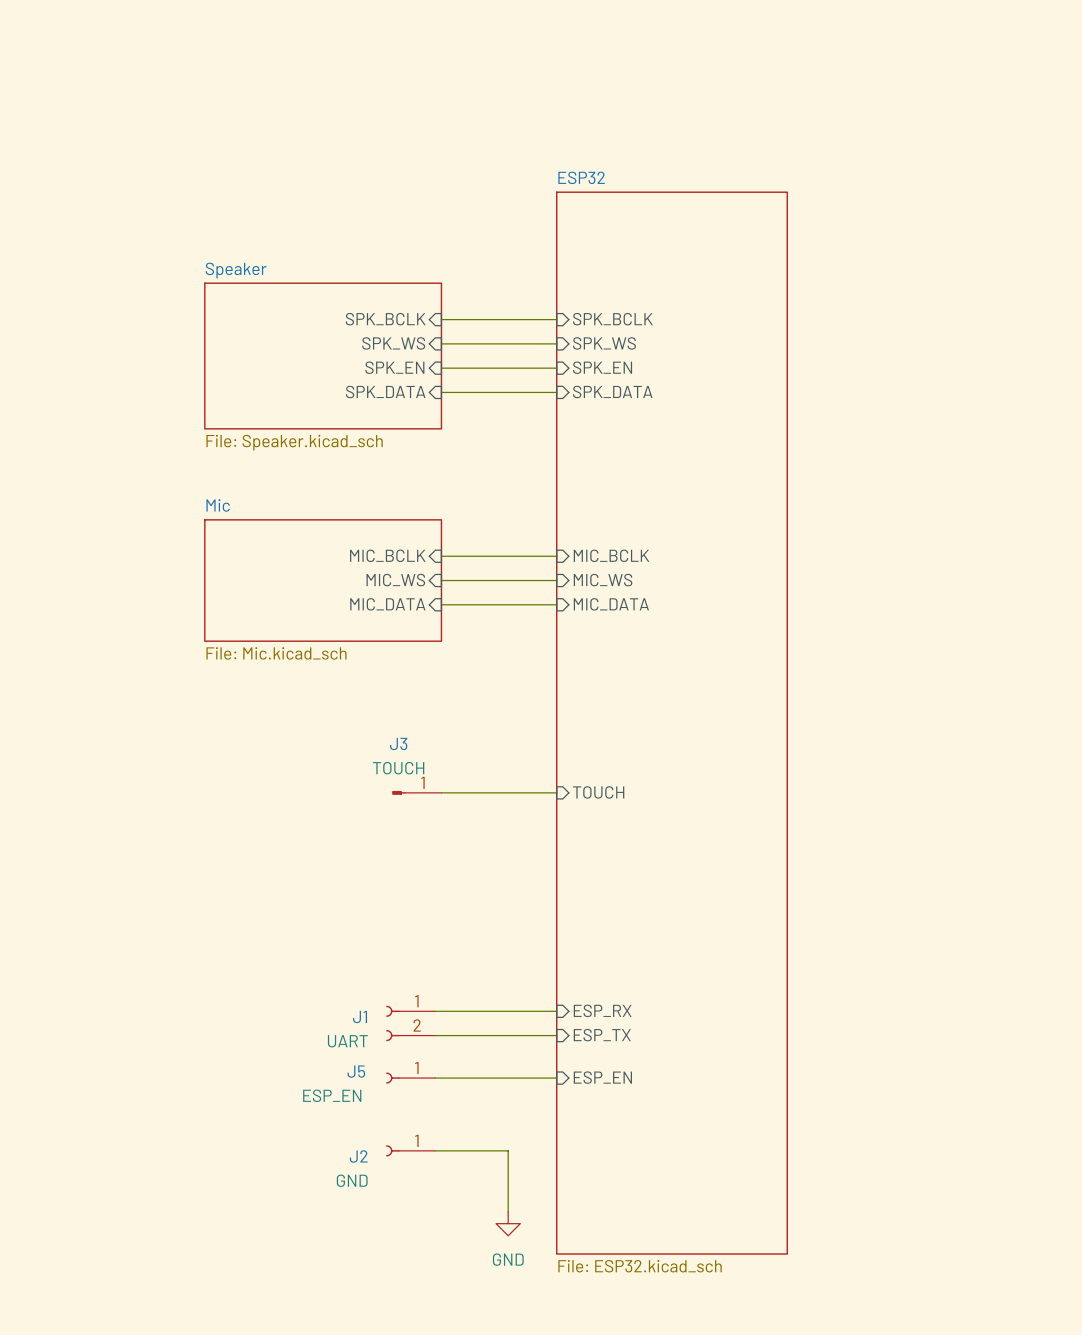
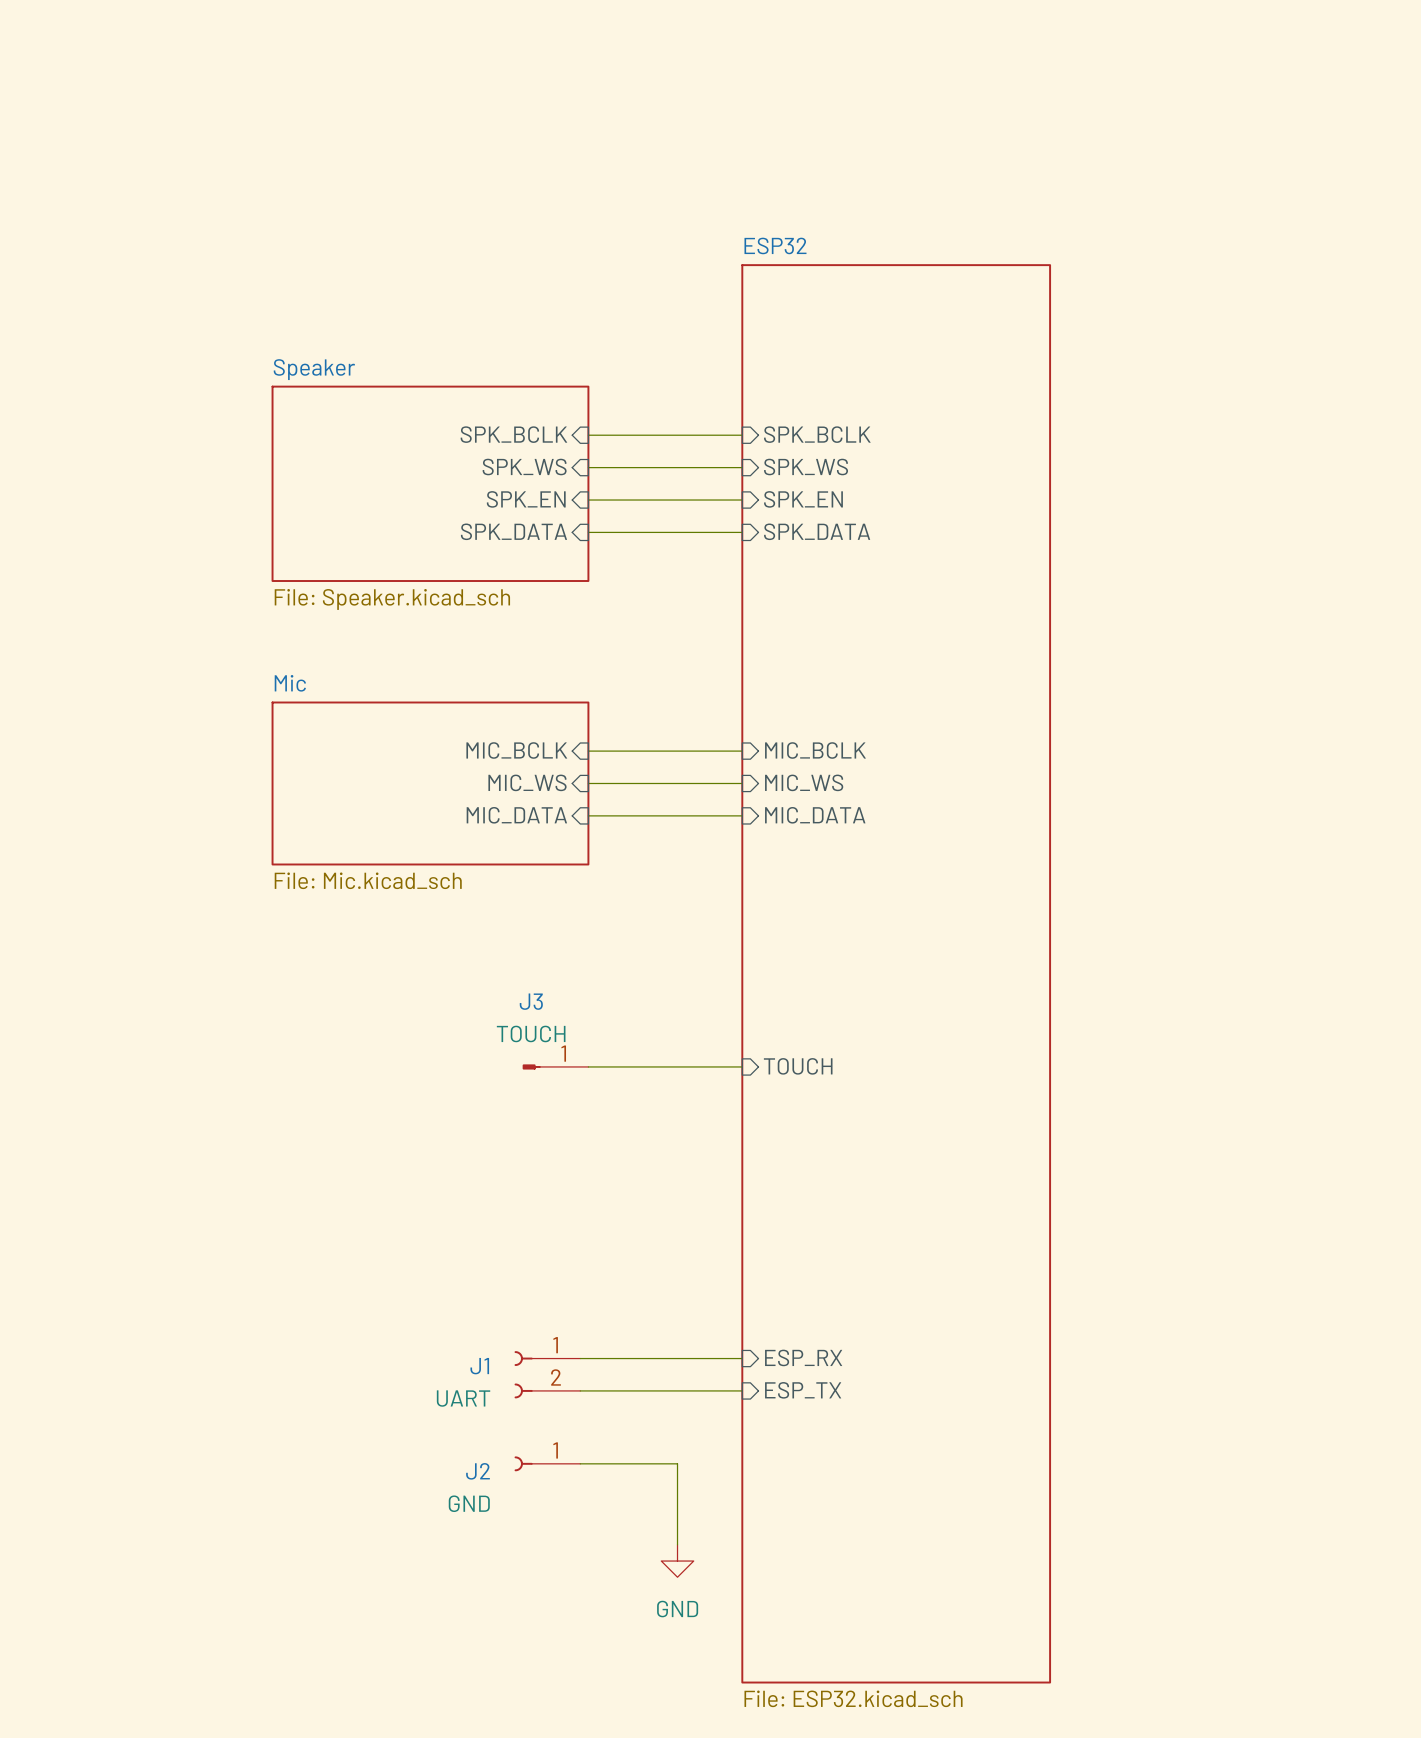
sheet pin: ESP_EN (602, 1077) -> none
J5: ESP_EN (410, 1078) -> none
wire: (435, 1078) (556, 1078) -> none
J2 position: (410, 1150) -> (547, 1463)
wire: (435, 1150) (508, 1150) (508, 1211) -> (580, 1463) (677, 1463) (677, 1544)
power symbol position: GND (508, 1223) -> GND (677, 1561)

